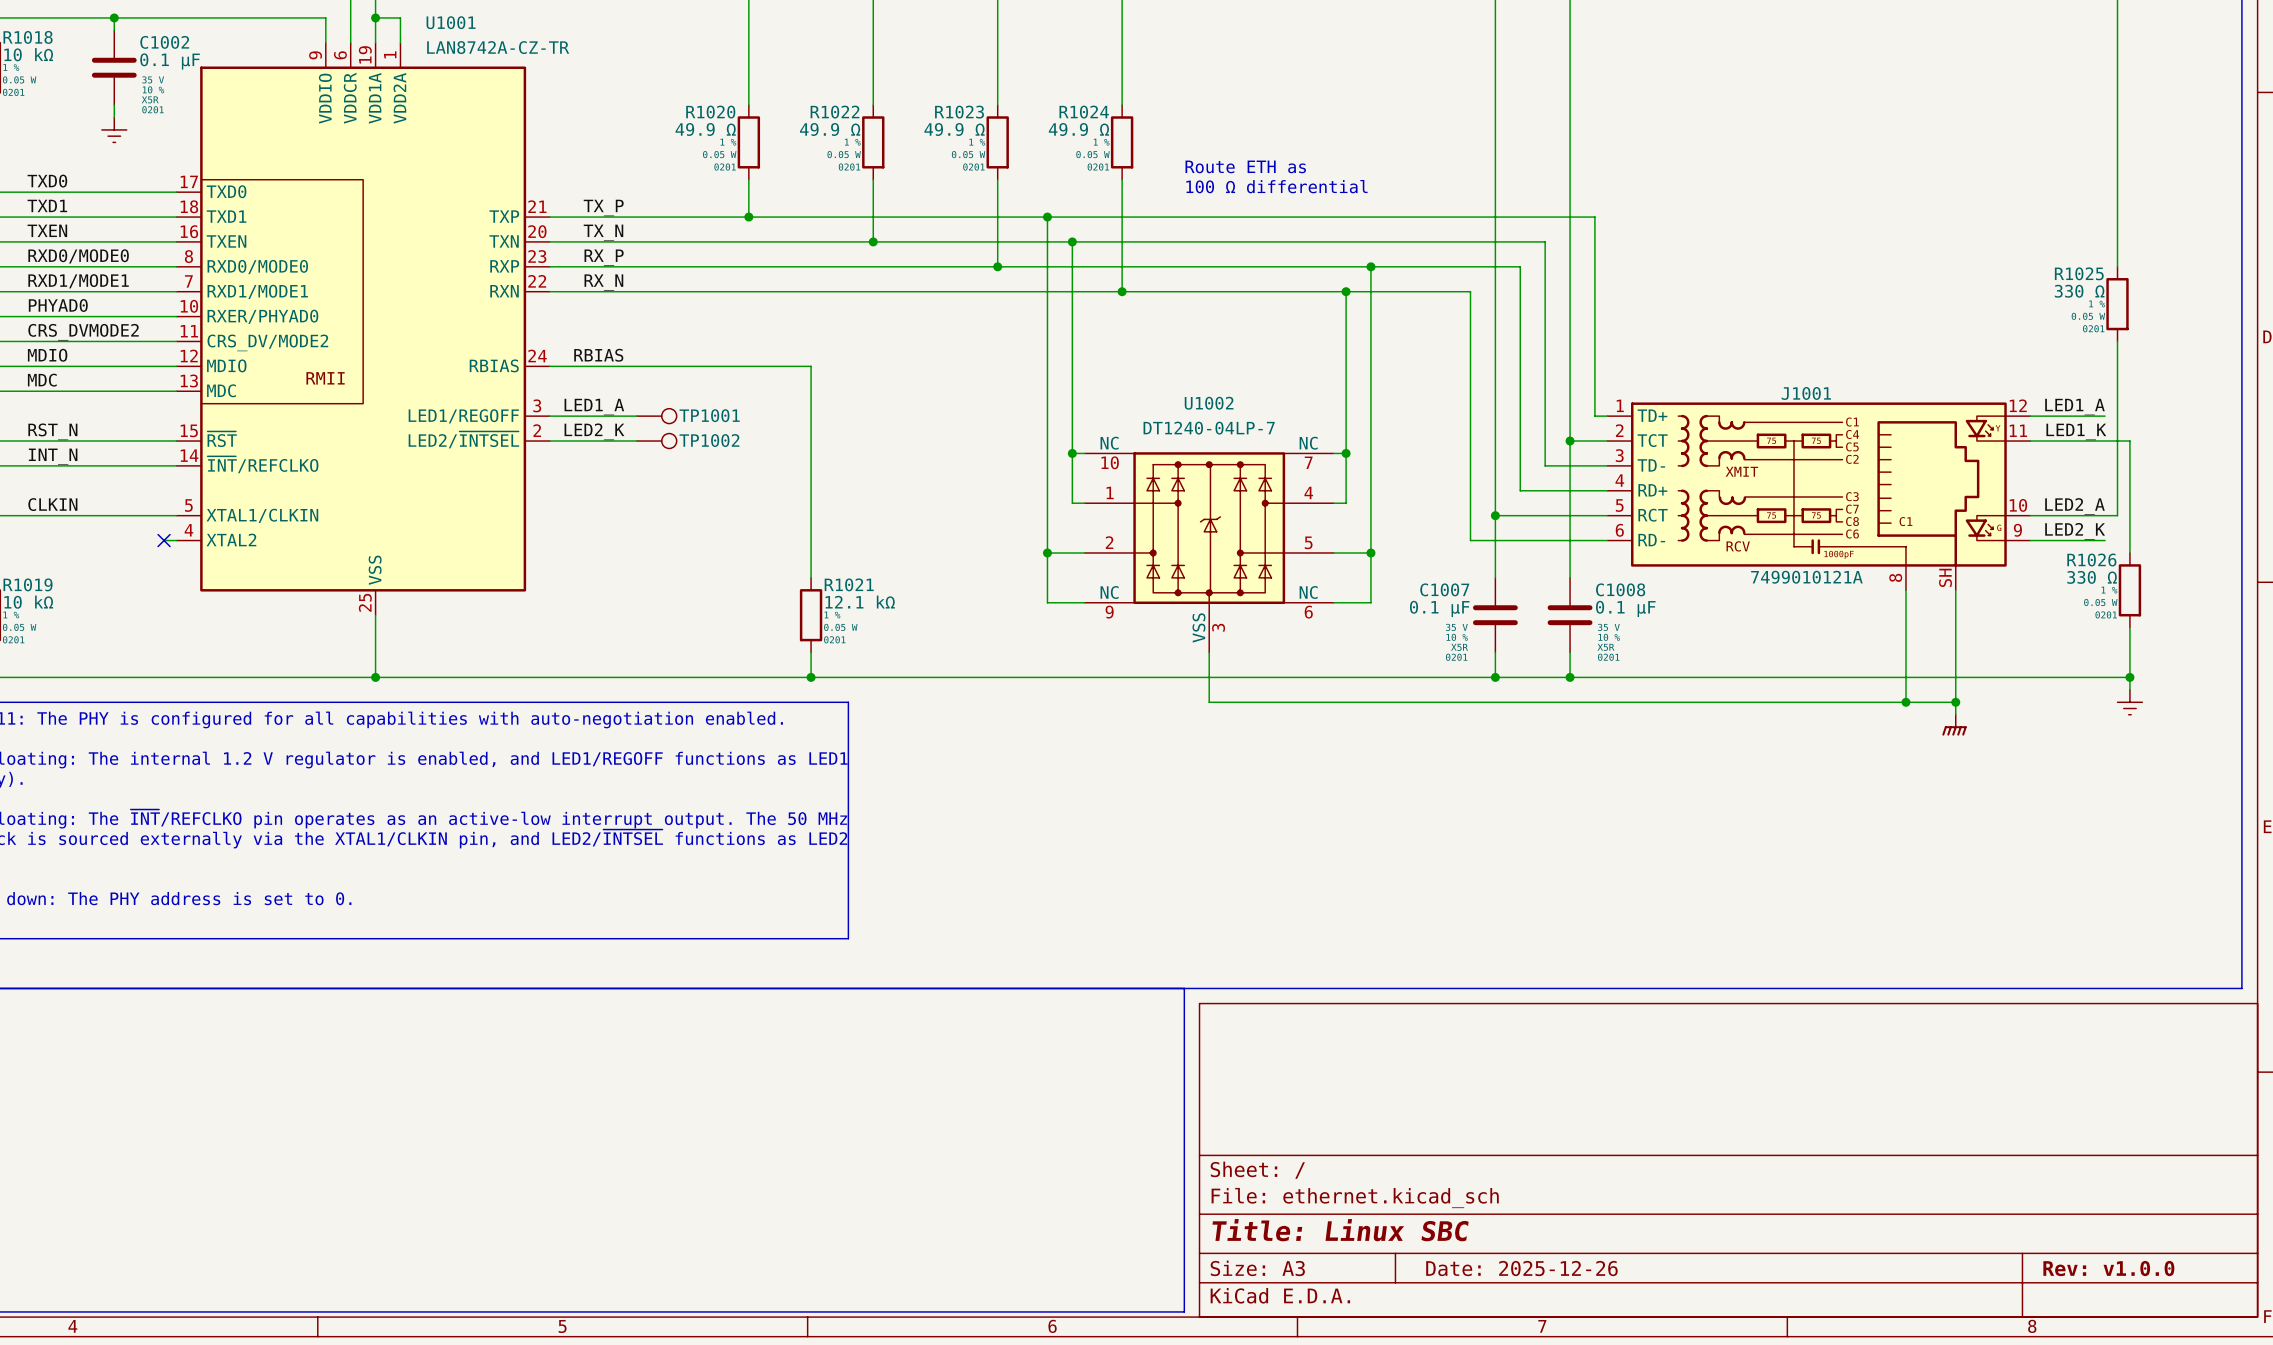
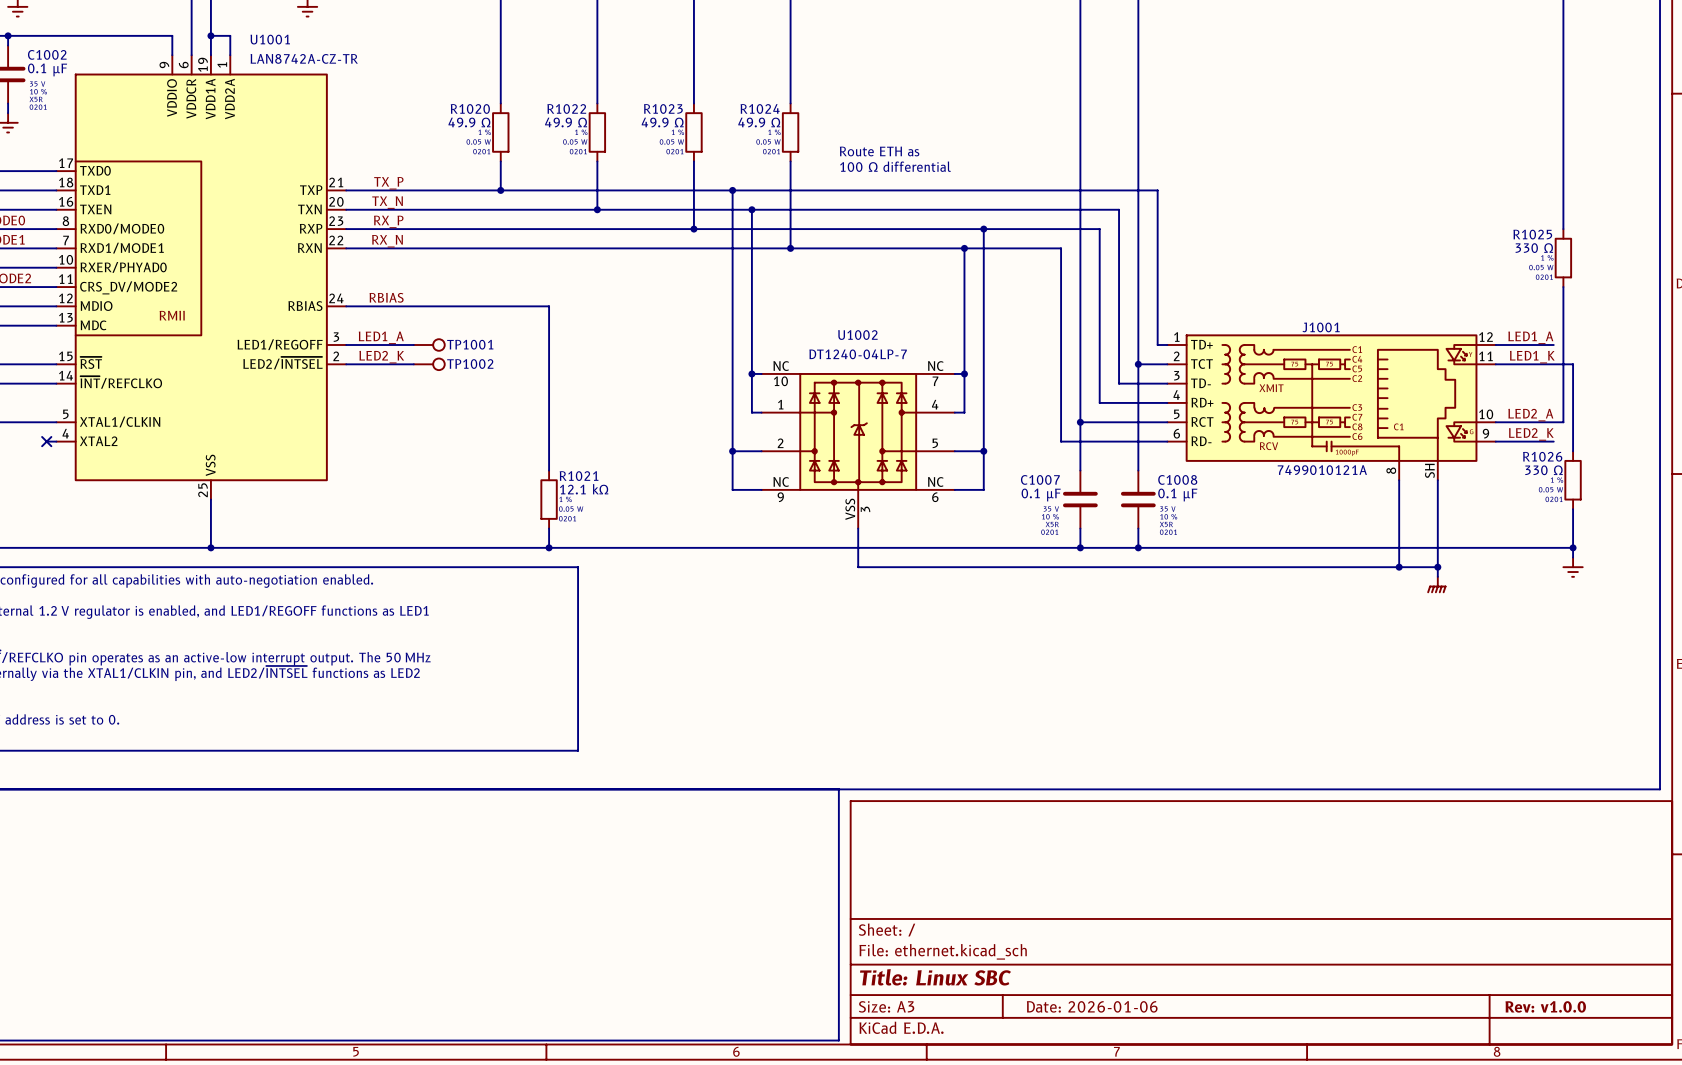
title block: Date: 2025-12-26 (1521, 1268) -> Date: 2026-01-06 (1092, 1006)

